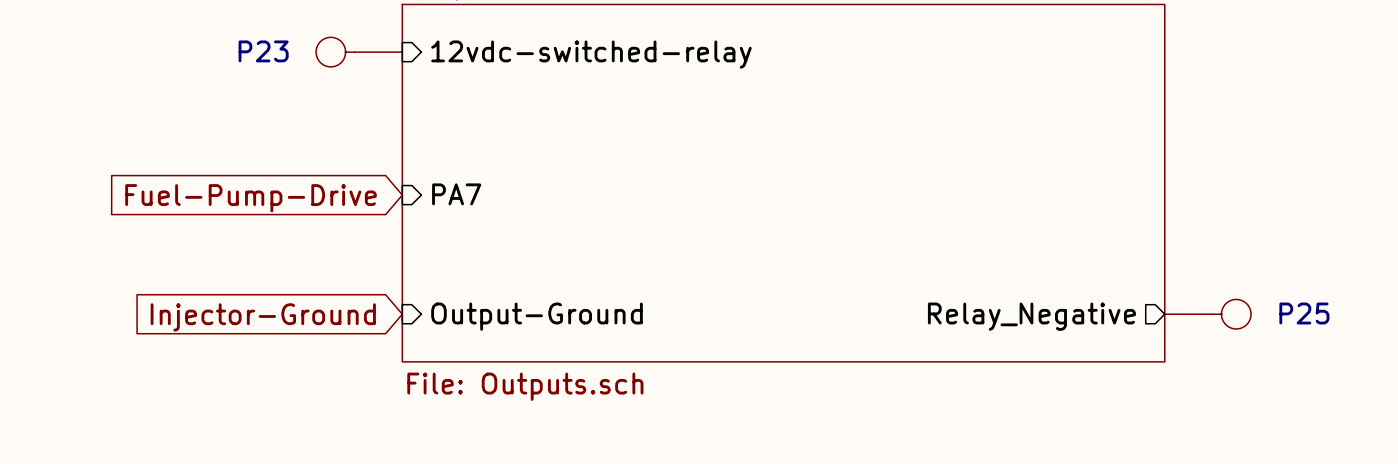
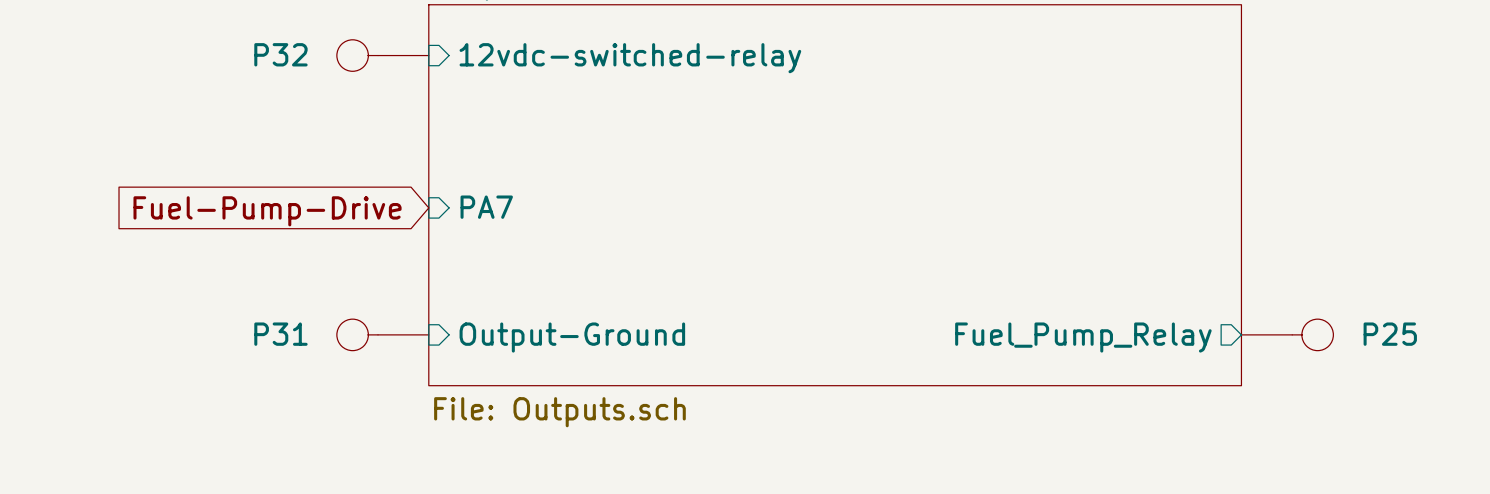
P23 name: P23 (263, 51) -> P32 (280, 54)
P31: none -> (382, 334)
sheet pin: Relay_Negative (1031, 316) -> Fuel_Pump_Relay (1083, 337)
global label: Injector-Ground (263, 317) -> none

